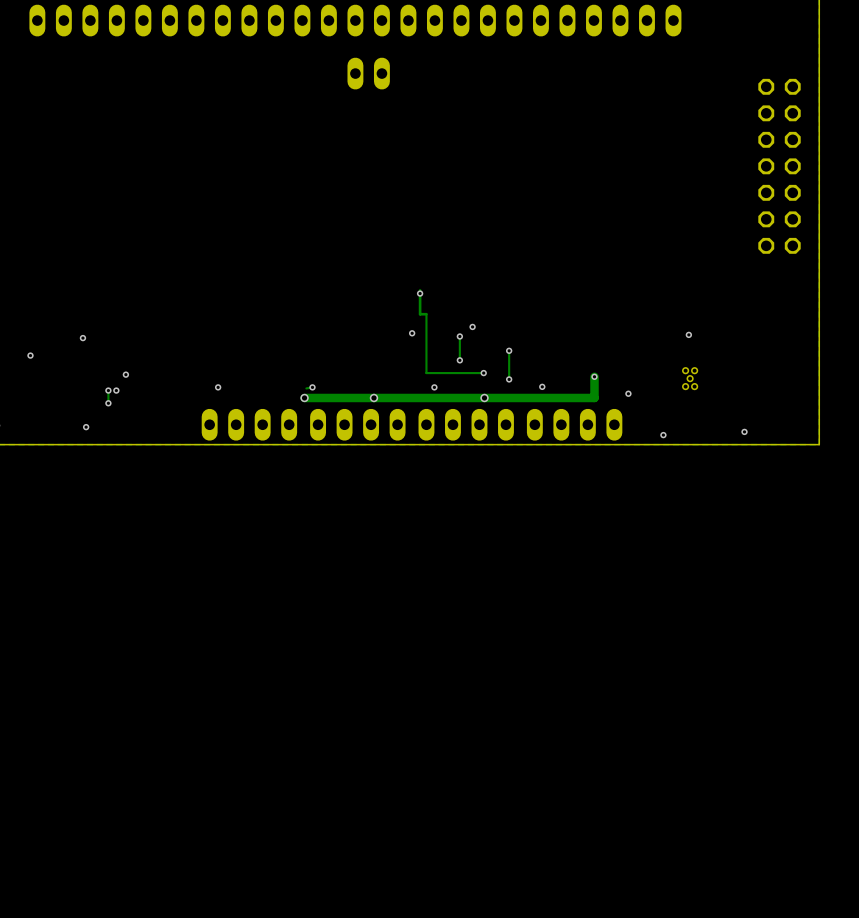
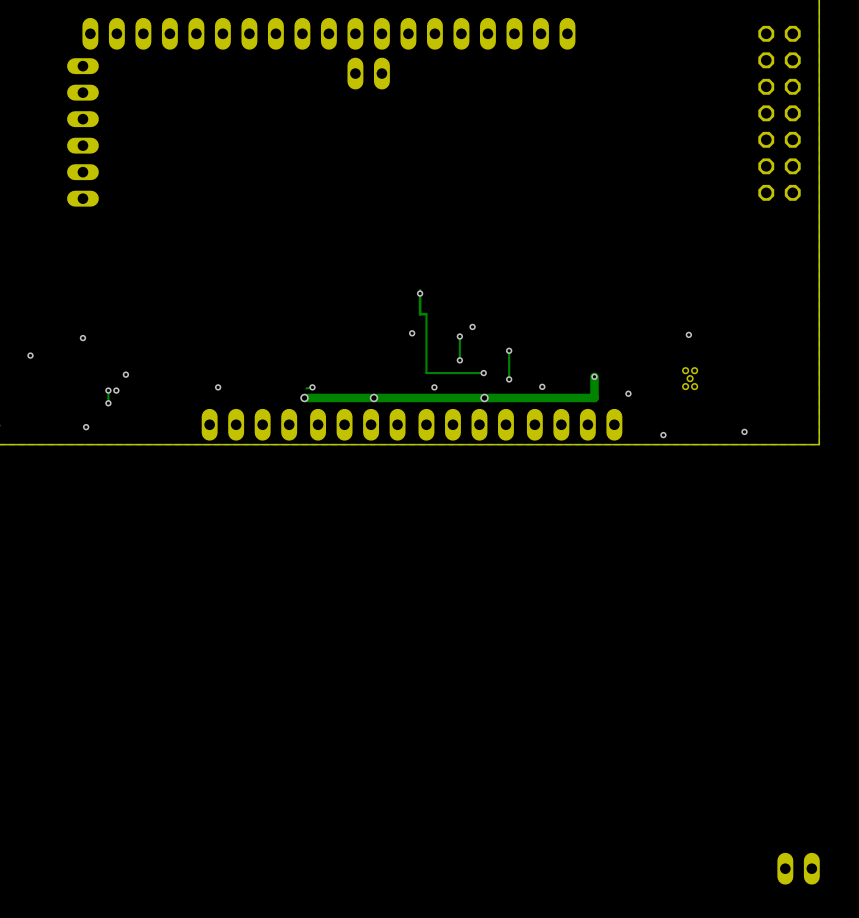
part rotation: 0° (103, 20) -> 90° clockwise (82, 132)
part position: (103, 20) -> (82, 132)
part position: (328, 20) -> (222, 33)
part position: (580, 20) -> (474, 33)
part position: (779, 166) -> (779, 113)
part: none -> (798, 868)

